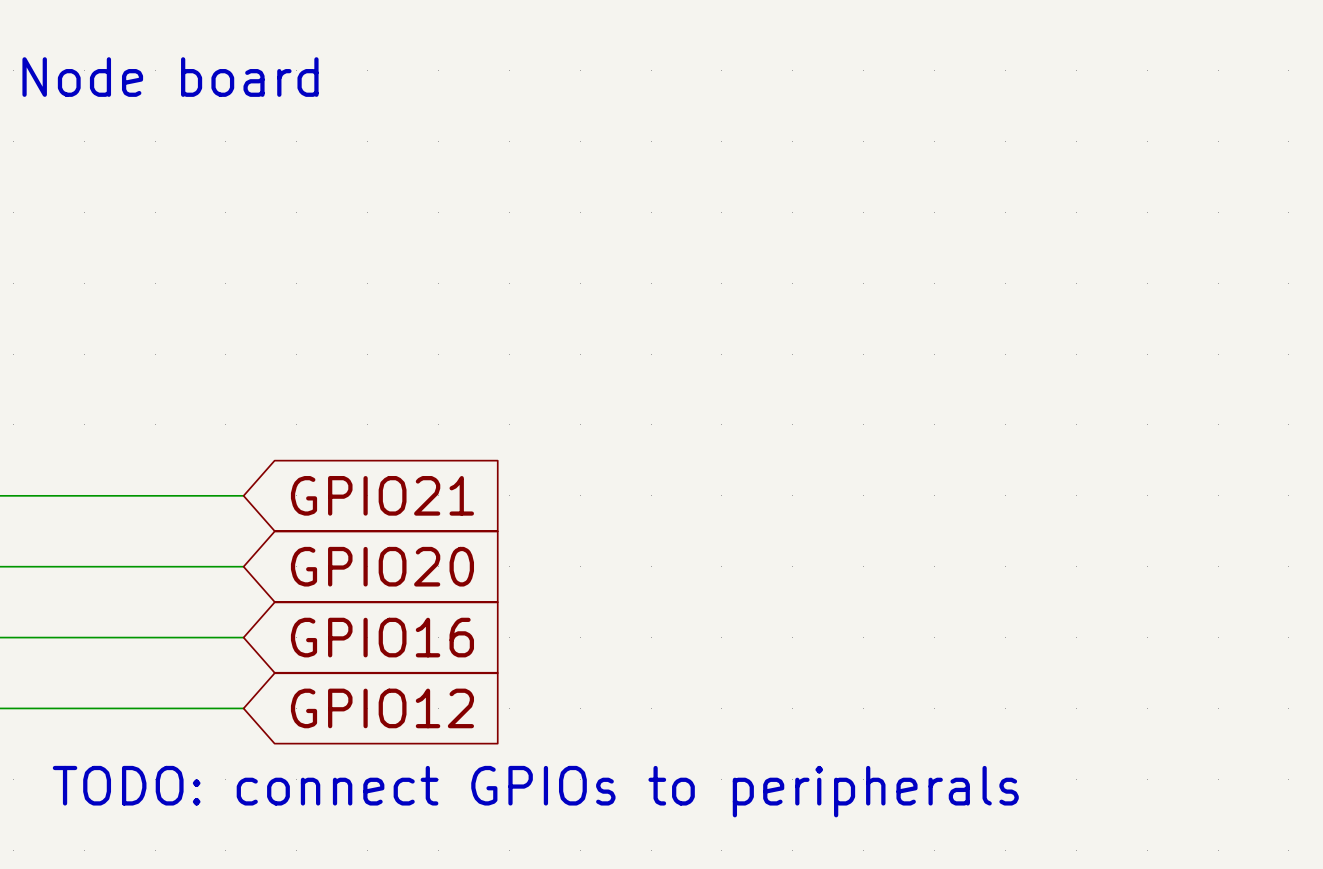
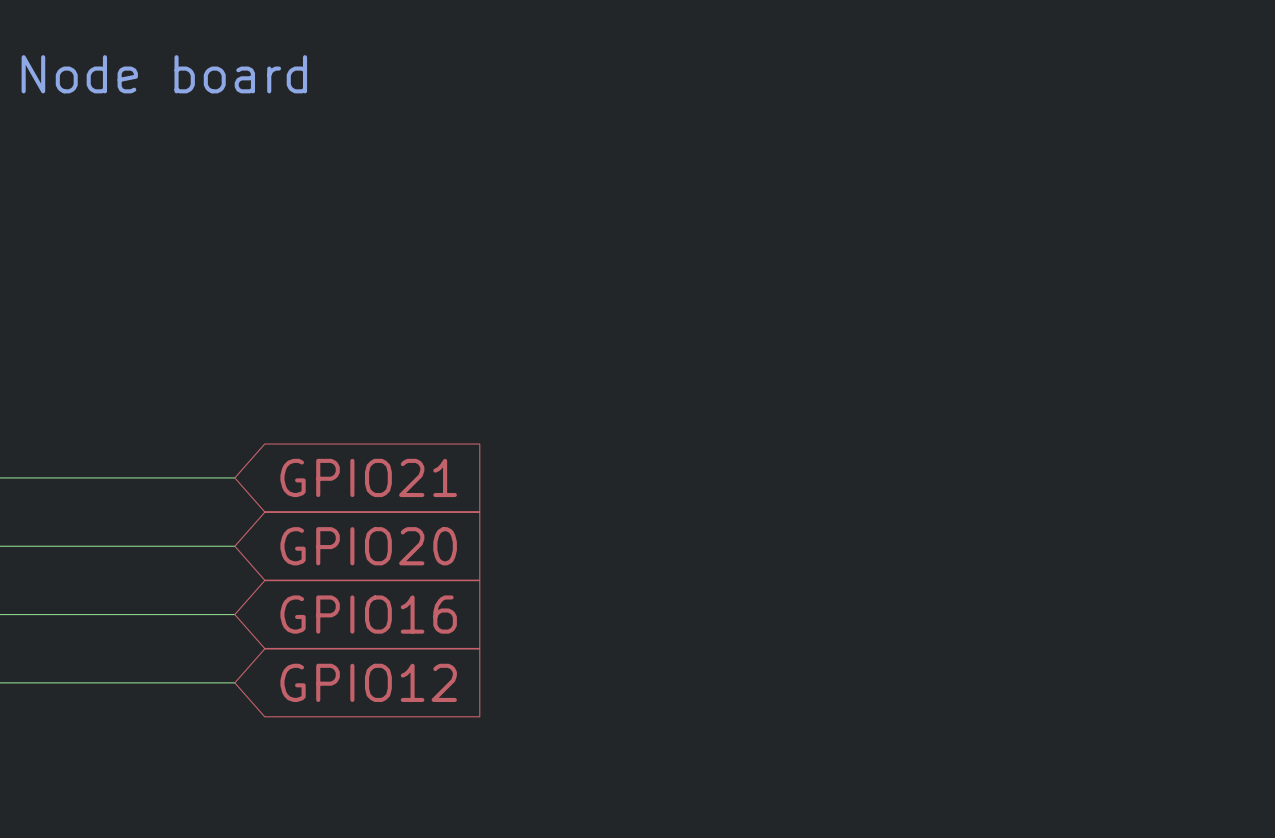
text: TODO: connect GPIOs to peripherals (535, 791) -> none

